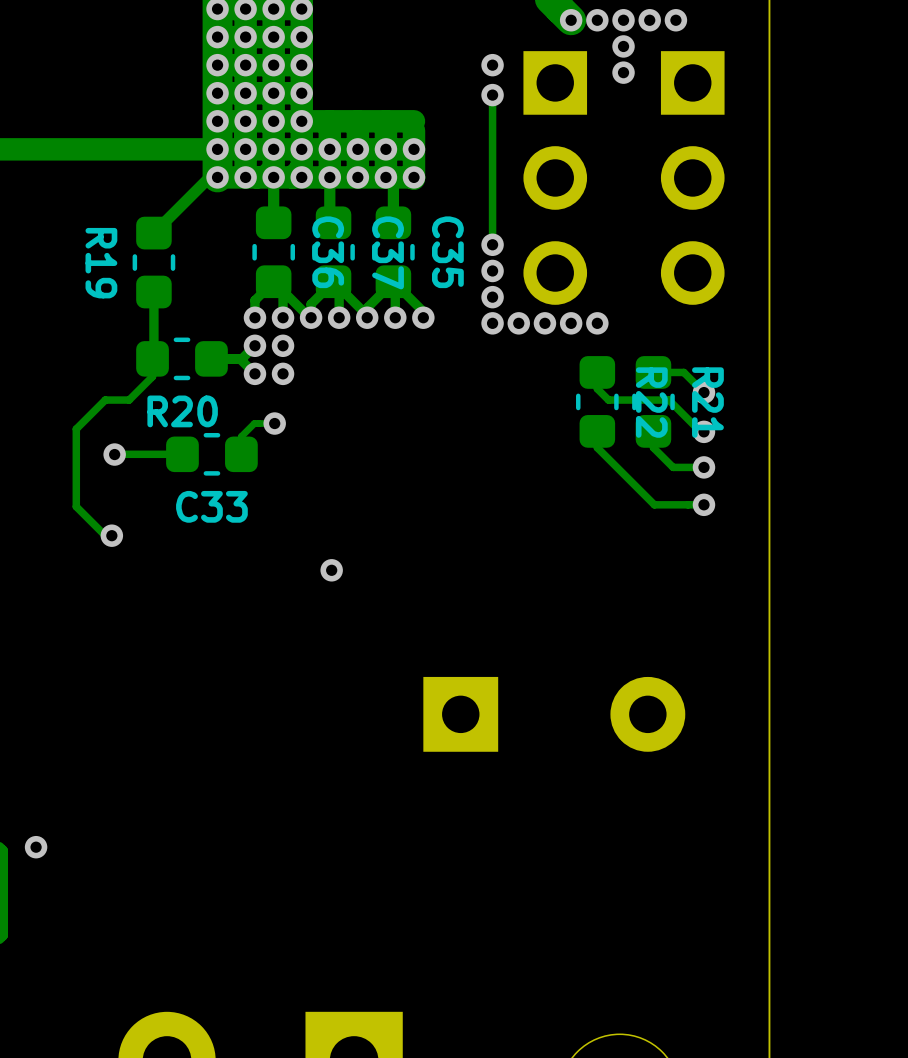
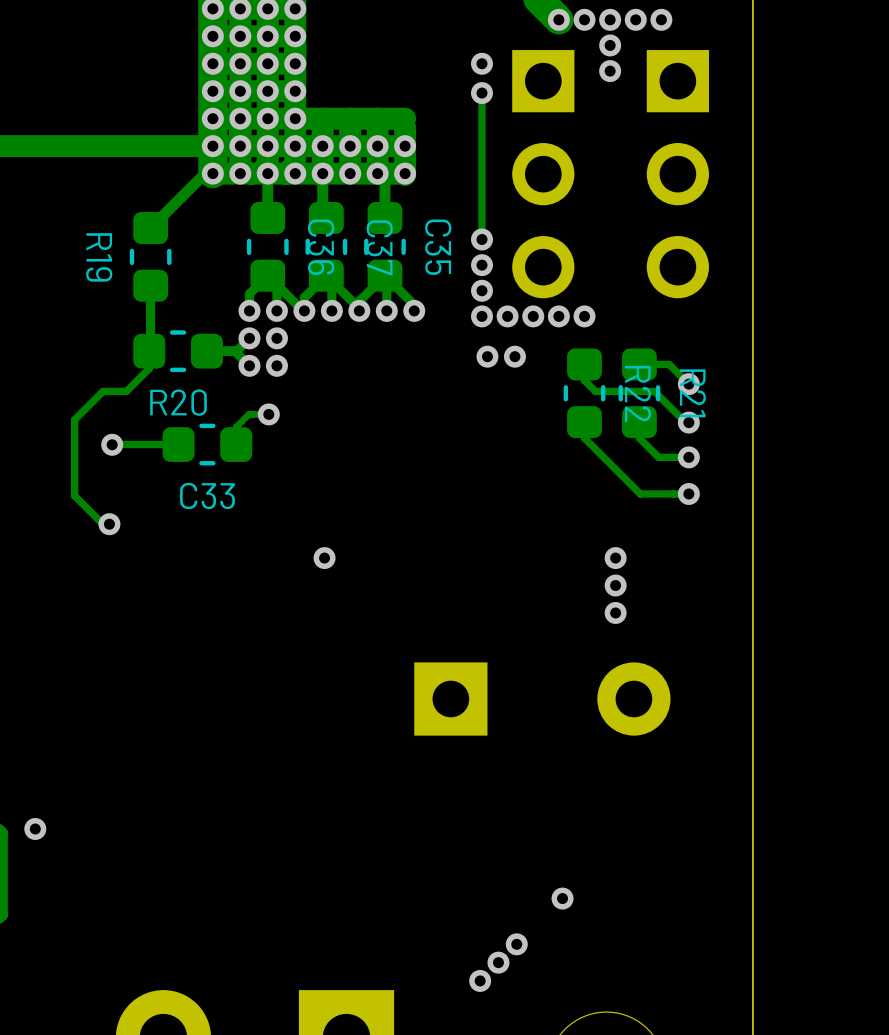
via: none -> (487, 356)
via: none -> (514, 356)
via: none -> (615, 558)
via: none -> (615, 585)
via: none -> (615, 612)
via: none -> (562, 898)
via: none -> (516, 944)
via: none -> (498, 962)
via: none -> (480, 980)

